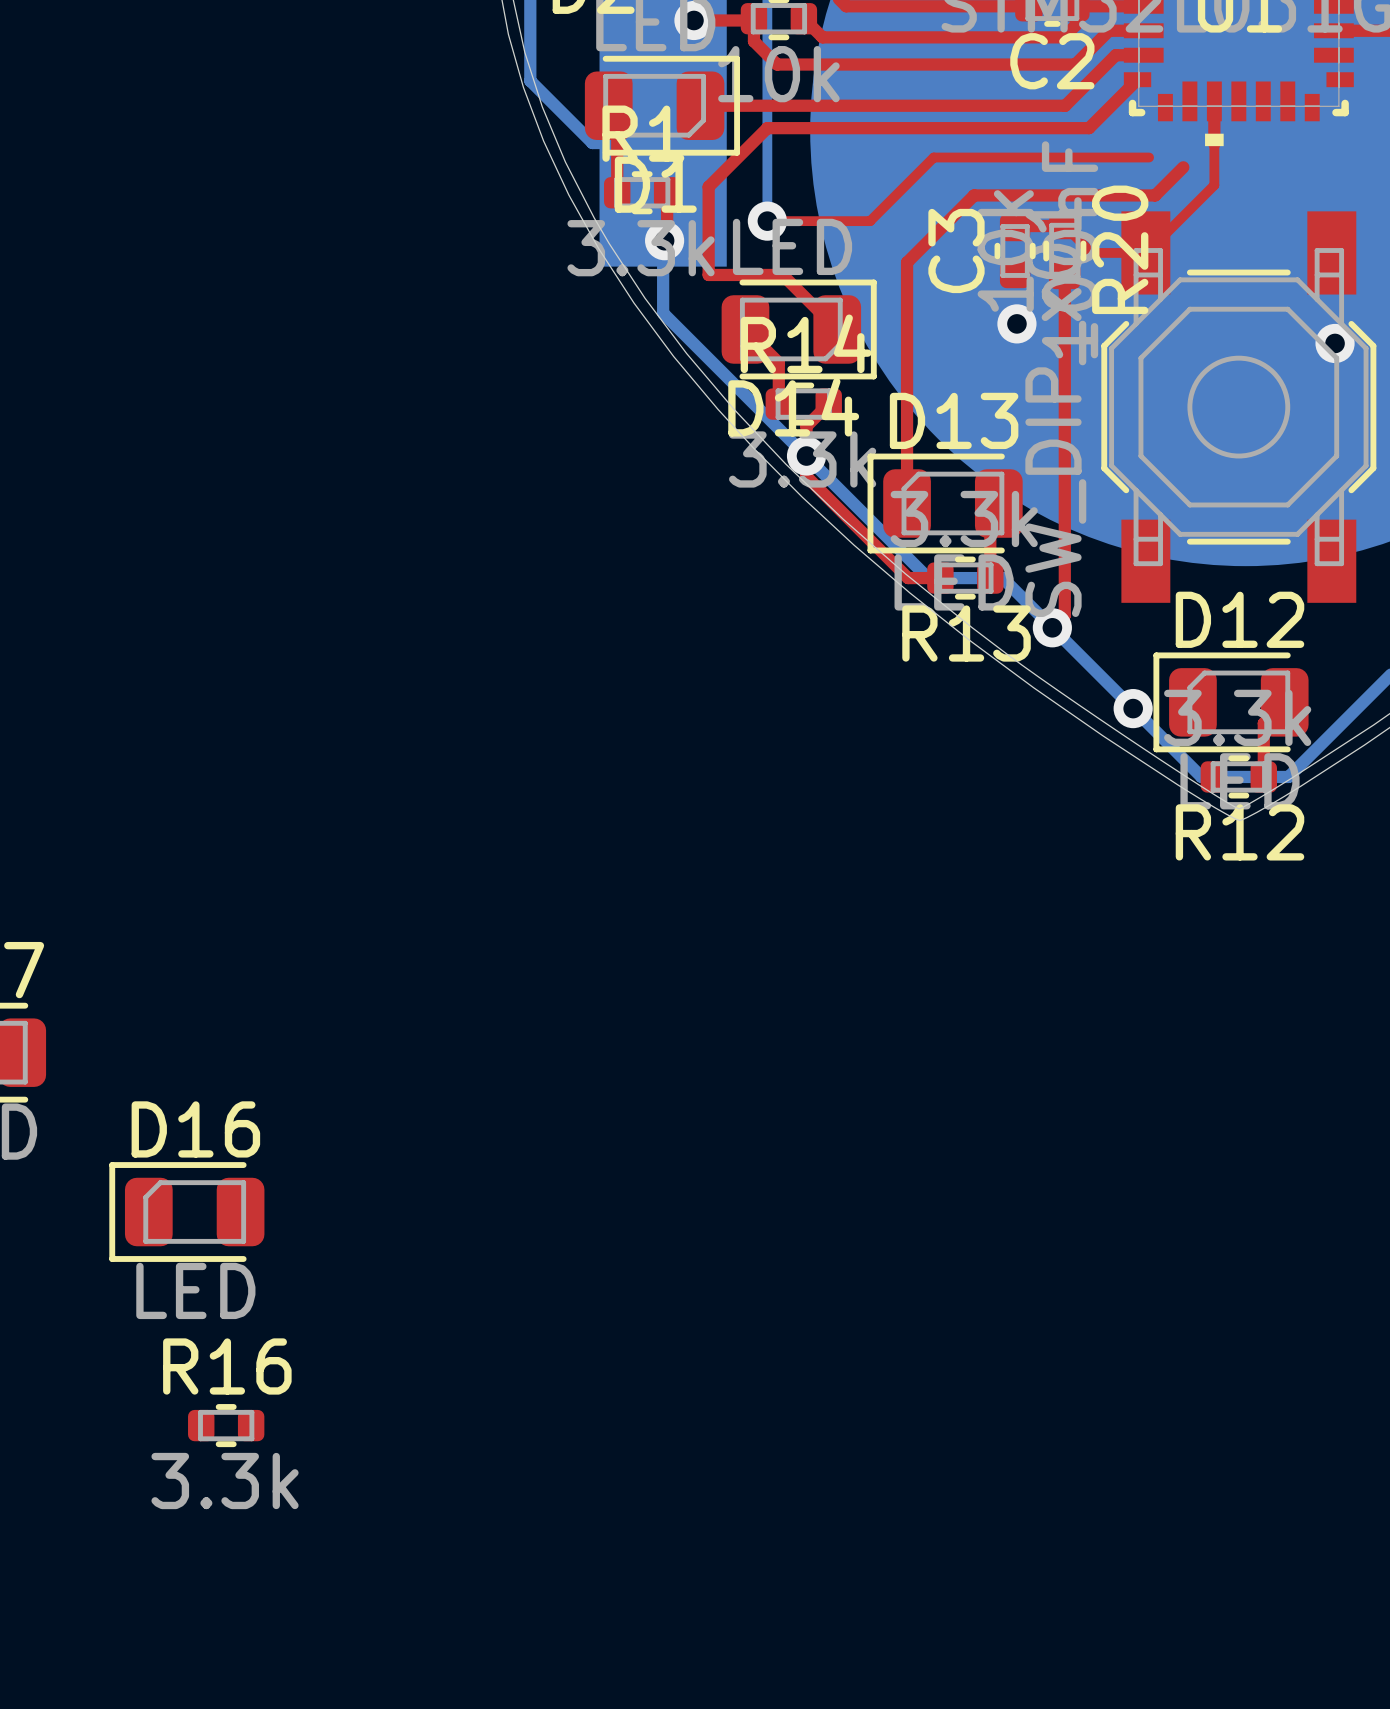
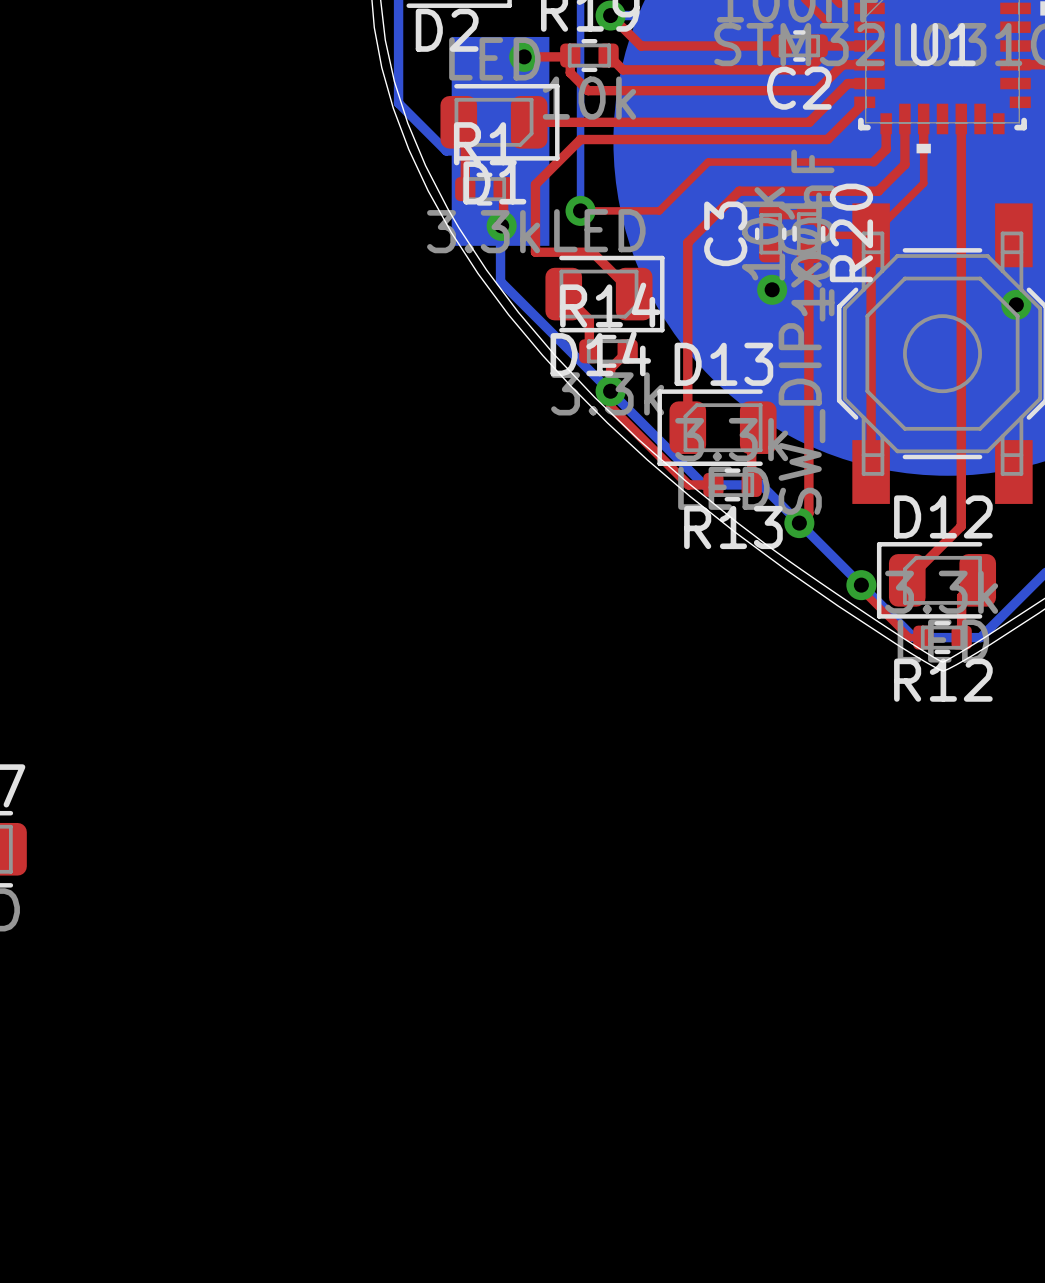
top track: none -> (904, 118) (904, 164) (899, 169)
top track: none -> (961, 118) (961, 526) (907, 580)
top track: none -> (886, 123) (886, 149) (873, 162)
top track: none -> (871, 235) (871, 472)
top track: none -> (853, 577) (853, 581) (909, 637) (923, 637)
D16: LED (186, 1212) -> none
R16: 3.3k (226, 1425) -> none

